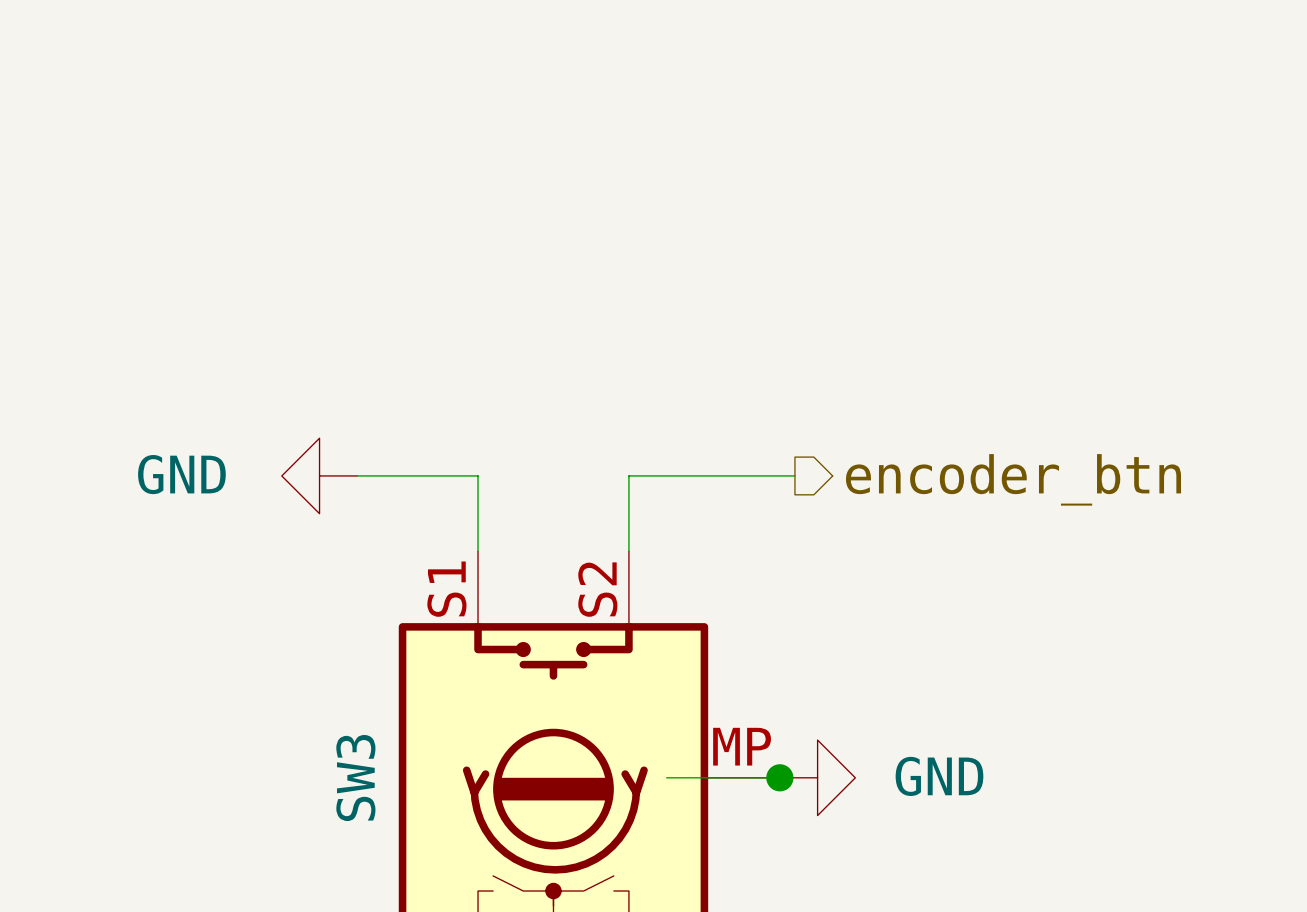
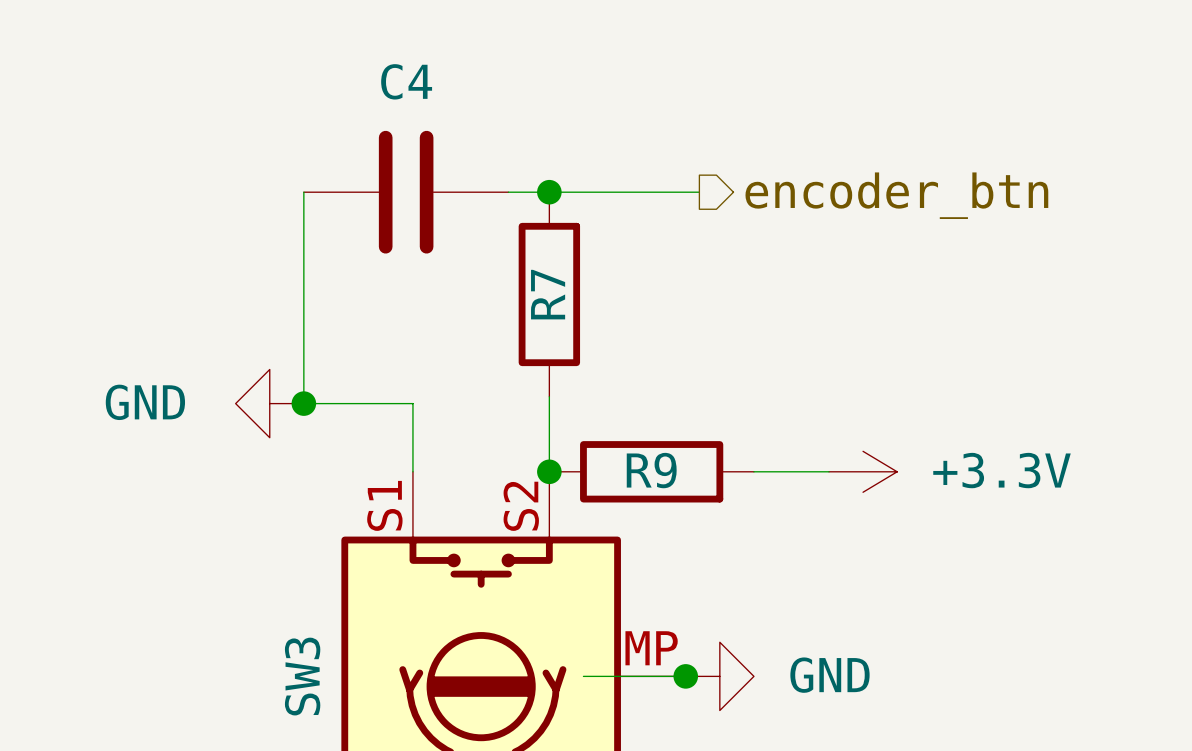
wire: none -> (303, 192) (303, 403)
C4: none -> (406, 192)
wire: none -> (508, 192) (699, 192)
junction: none -> (549, 192)
R7: none -> (549, 294)
junction: none -> (303, 403)
wire: (628, 475) (794, 475) -> (549, 403) (549, 396)
hierarchical label position: encoder_btn (1013, 479) -> encoder_btn (896, 195)
junction: none -> (549, 471)
R9: none -> (651, 471)
wire: none -> (753, 471) (828, 471)
power symbol: none -> +3.3V (863, 471)

